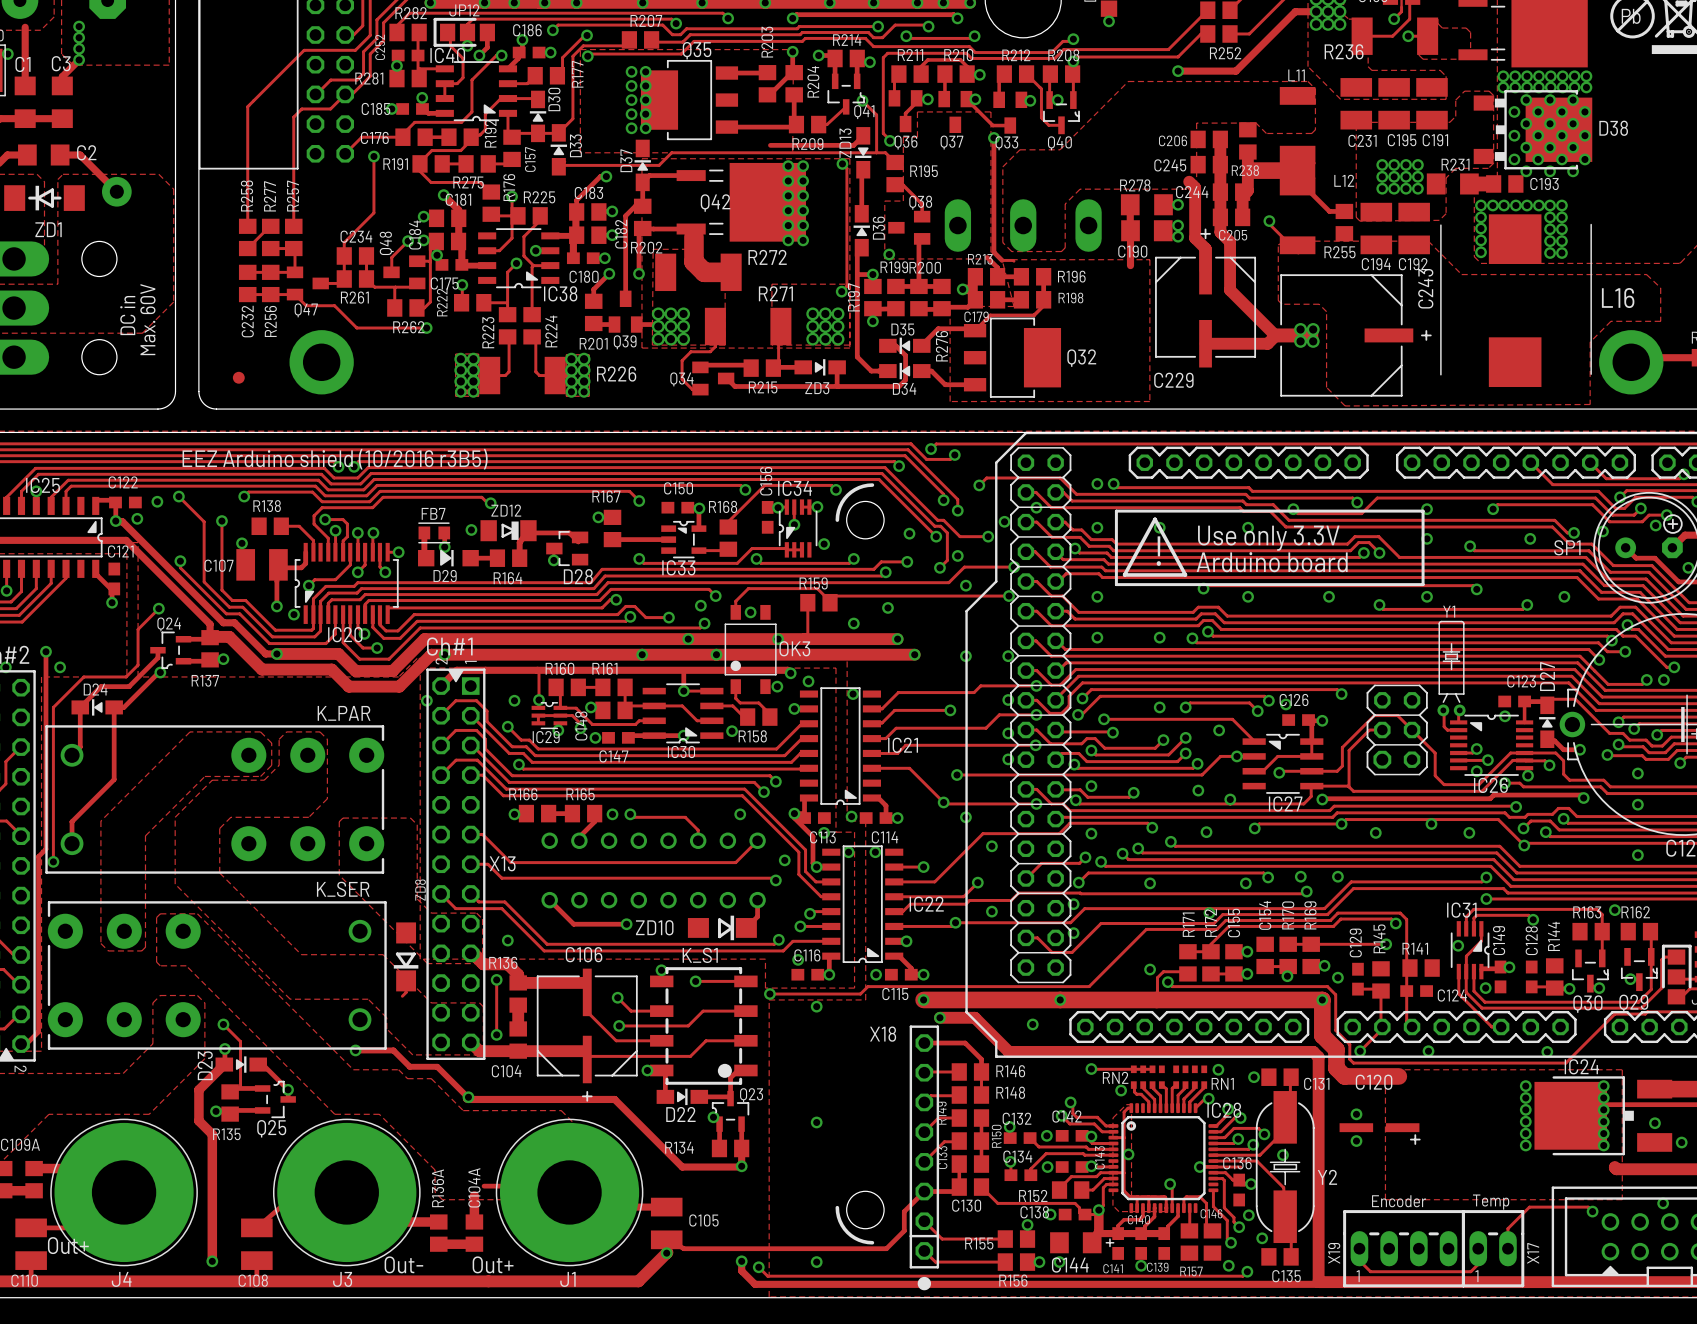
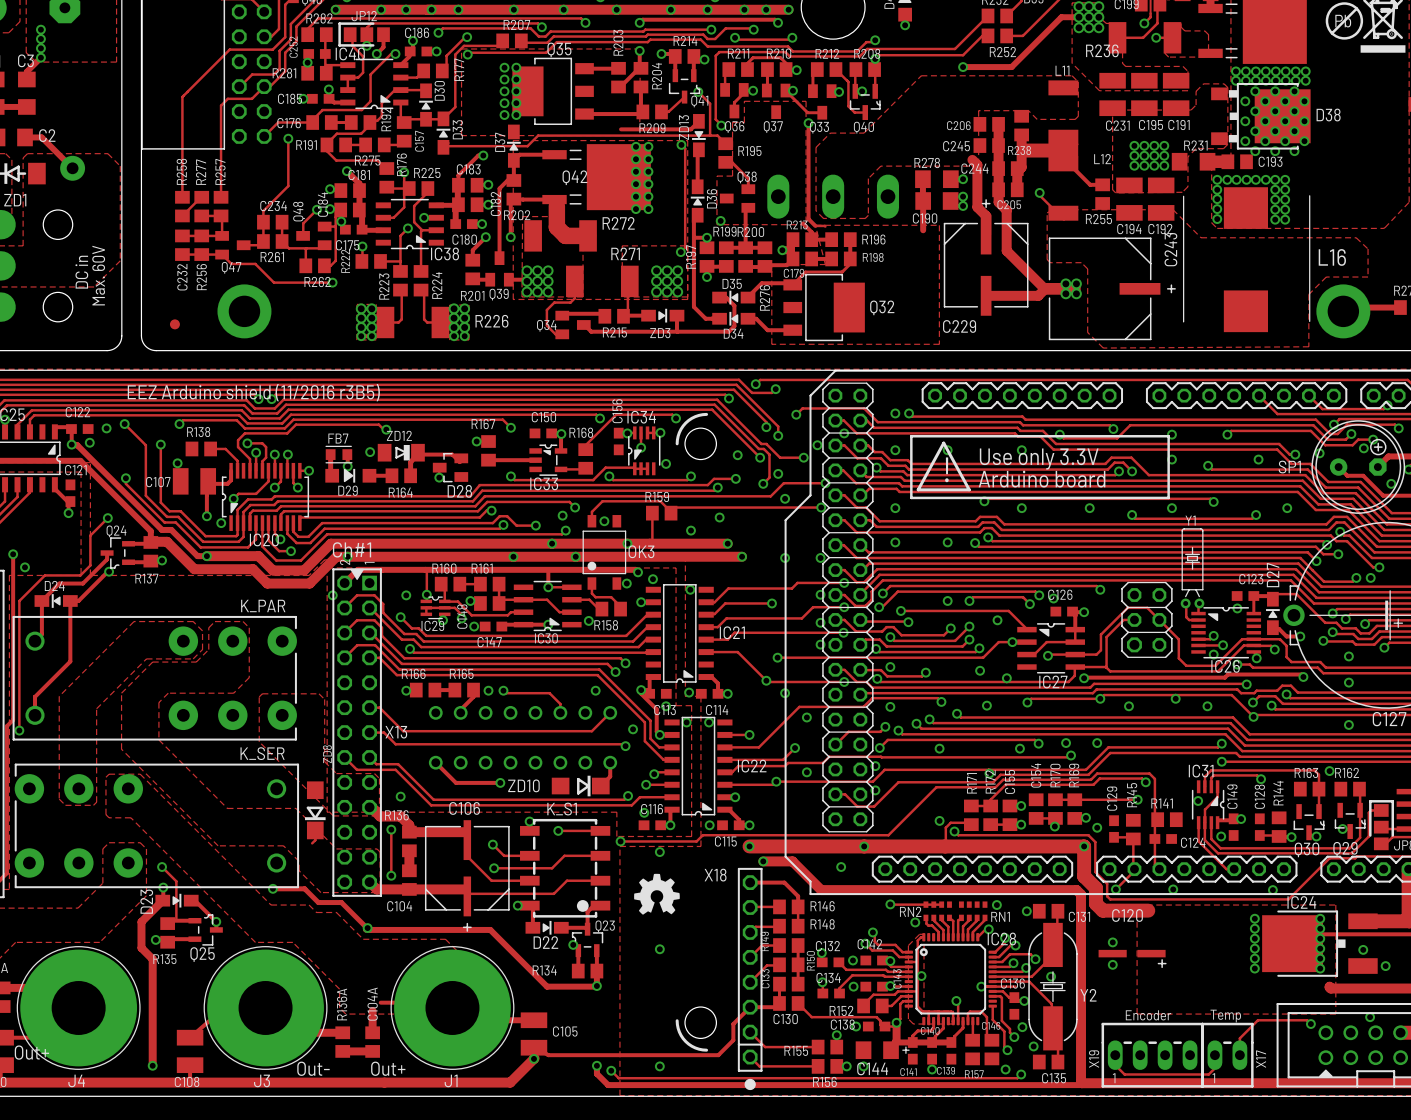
text: EEZ Arduino shield (10/2016 r3B5) (335, 459) -> EEZ Arduino shield (11/2016 r3B5) (253, 392)
drawing: none -> [634, 873, 680, 915]

